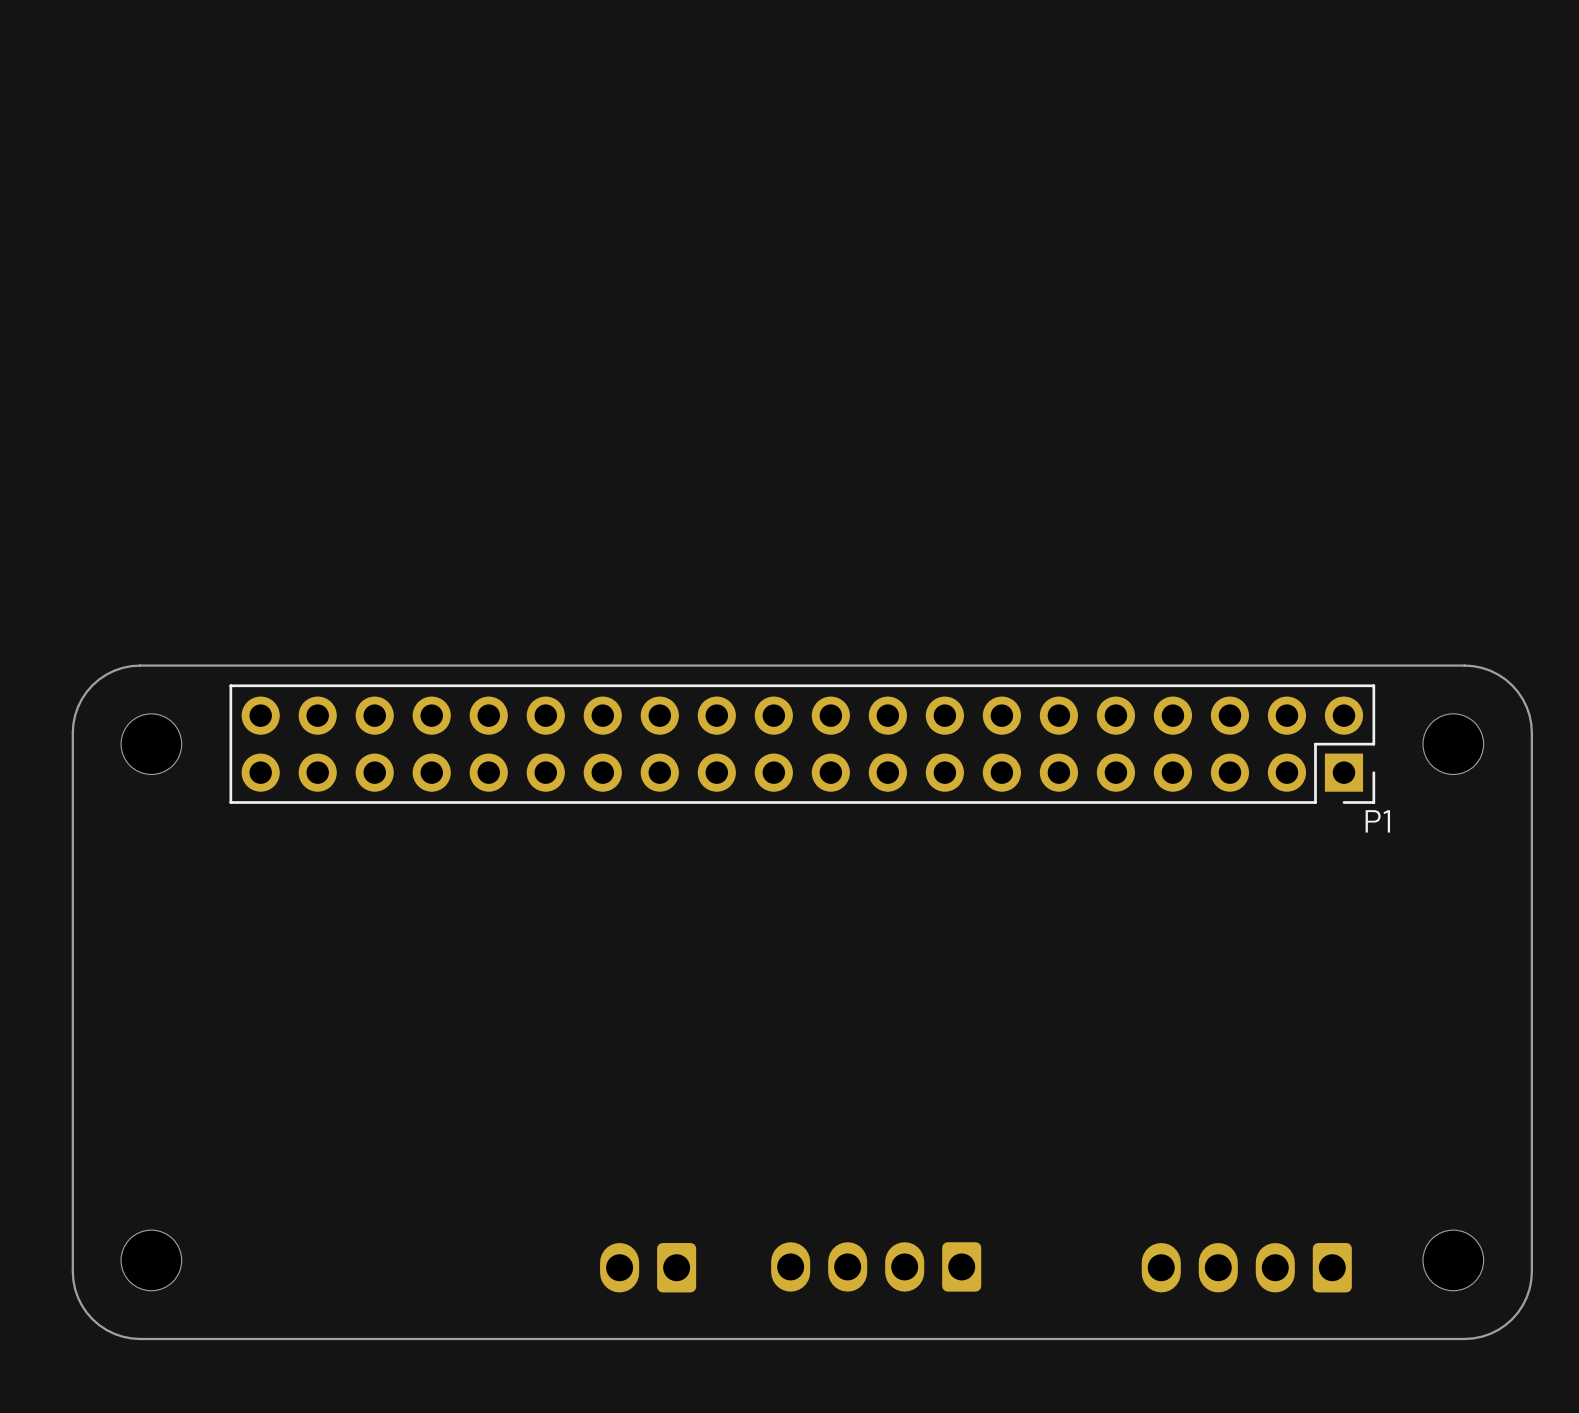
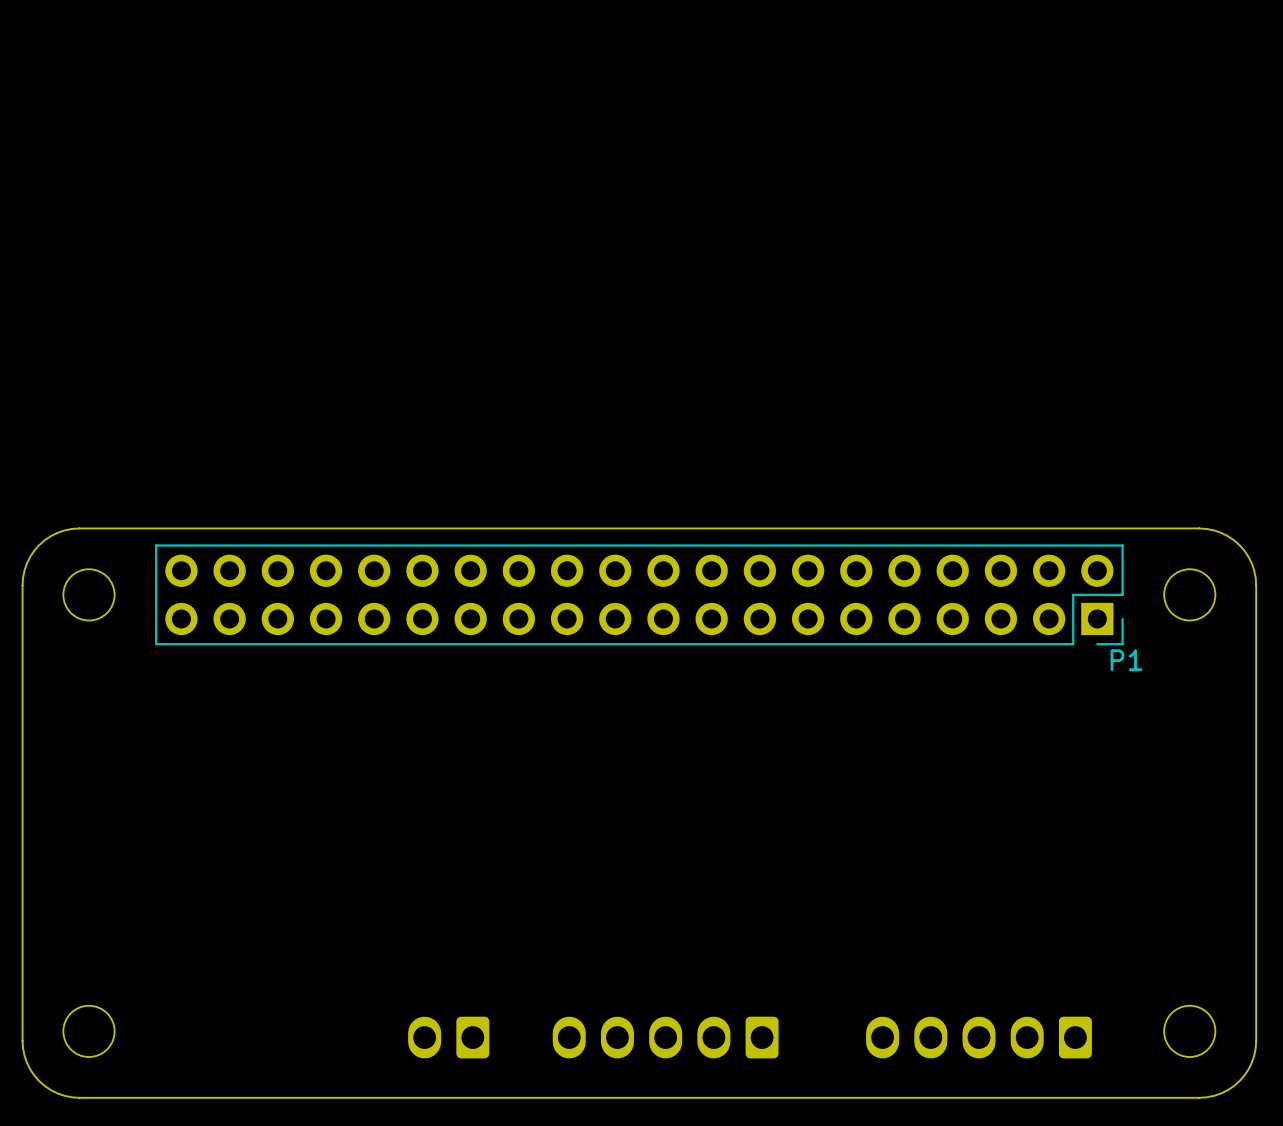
part: (876, 1266) -> none
part position: (648, 1267) -> (448, 1037)
part: none -> (665, 1037)
part: none -> (979, 1037)
part: (1246, 1267) -> none

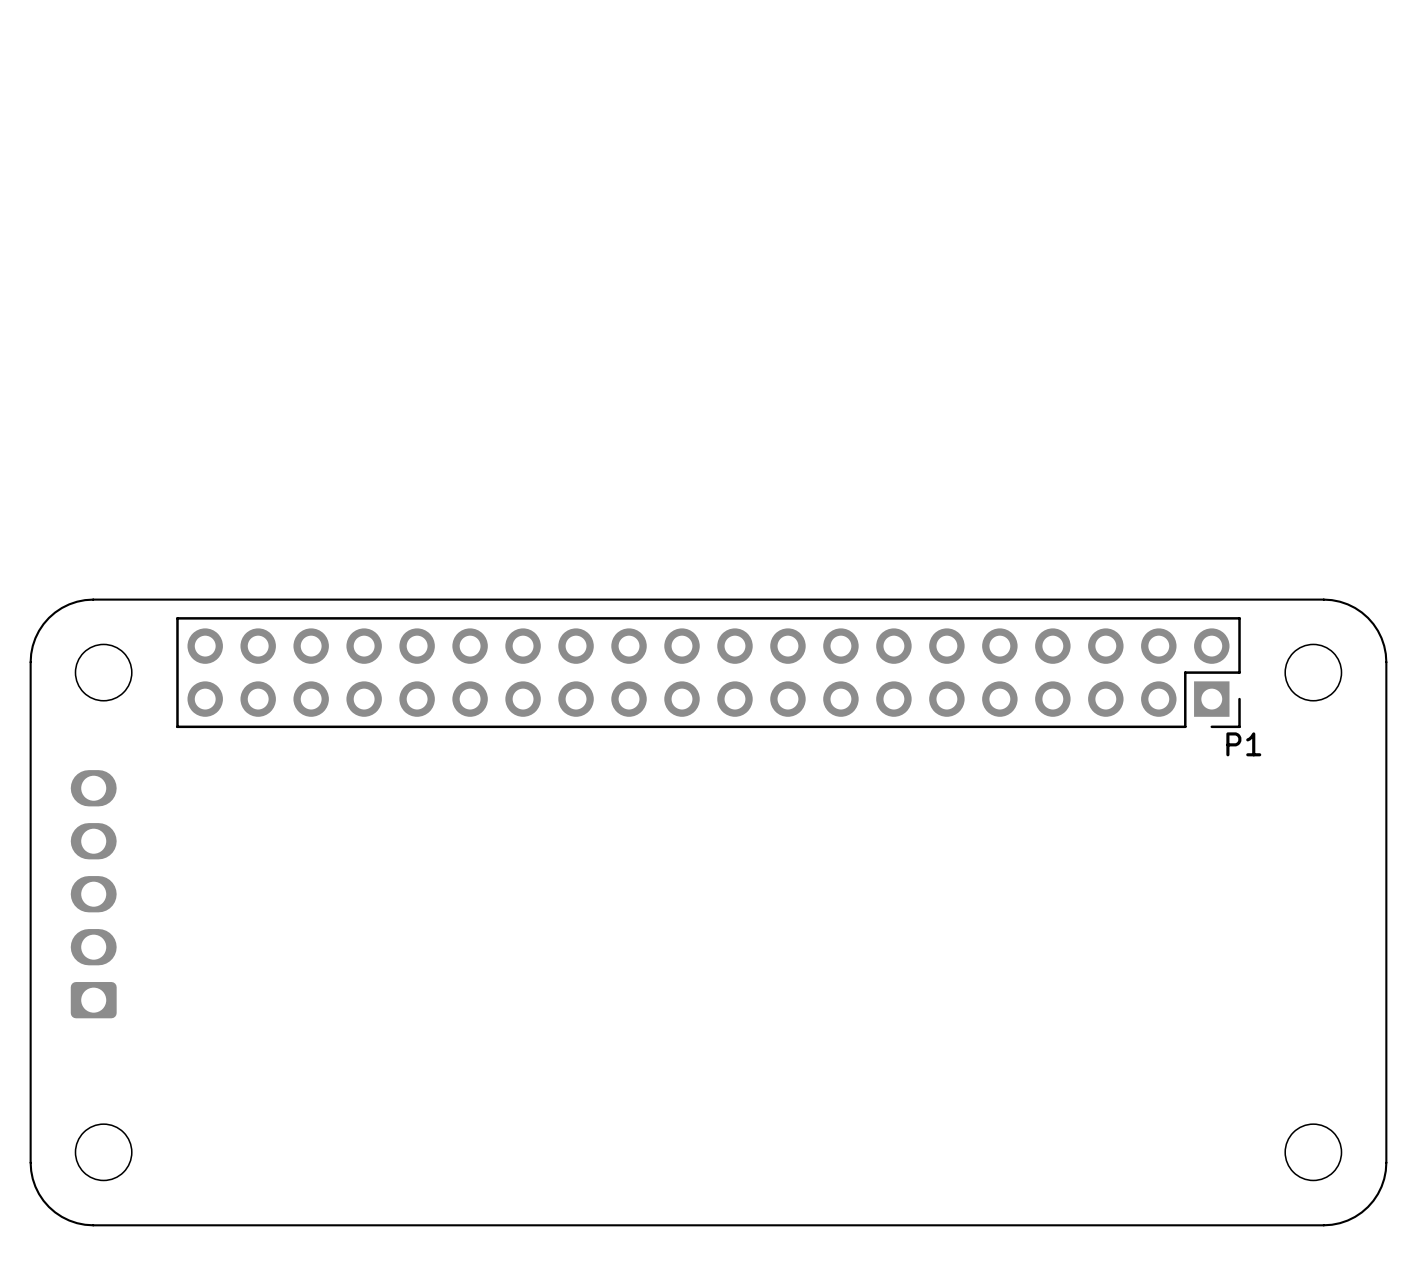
part: none -> (93, 894)
part: (448, 1037) -> none
part: (665, 1037) -> none
part: (979, 1037) -> none

